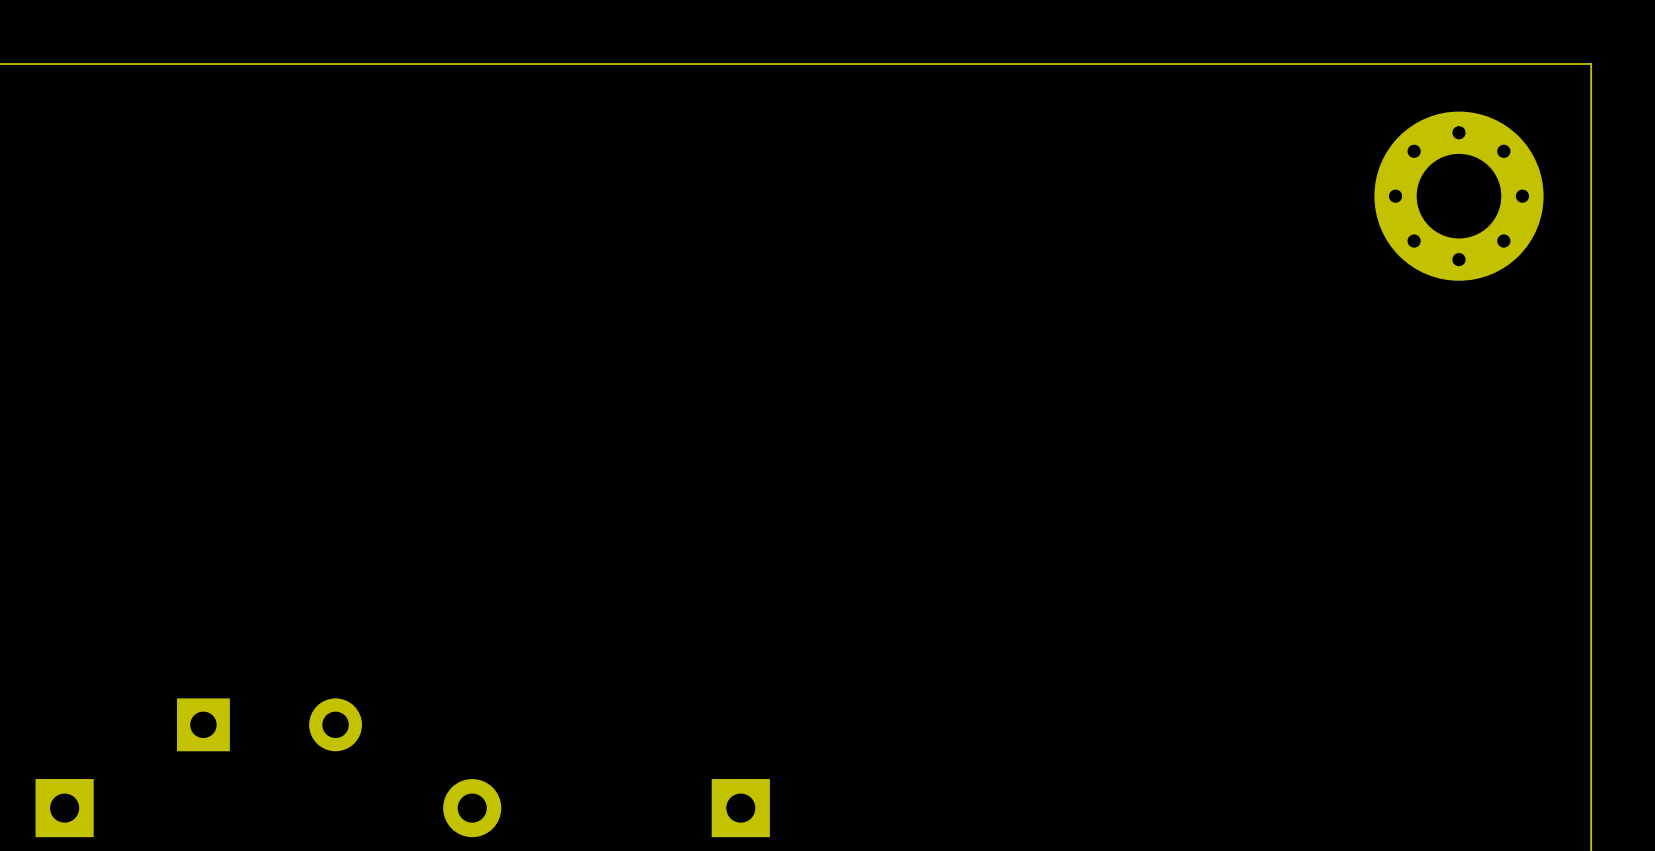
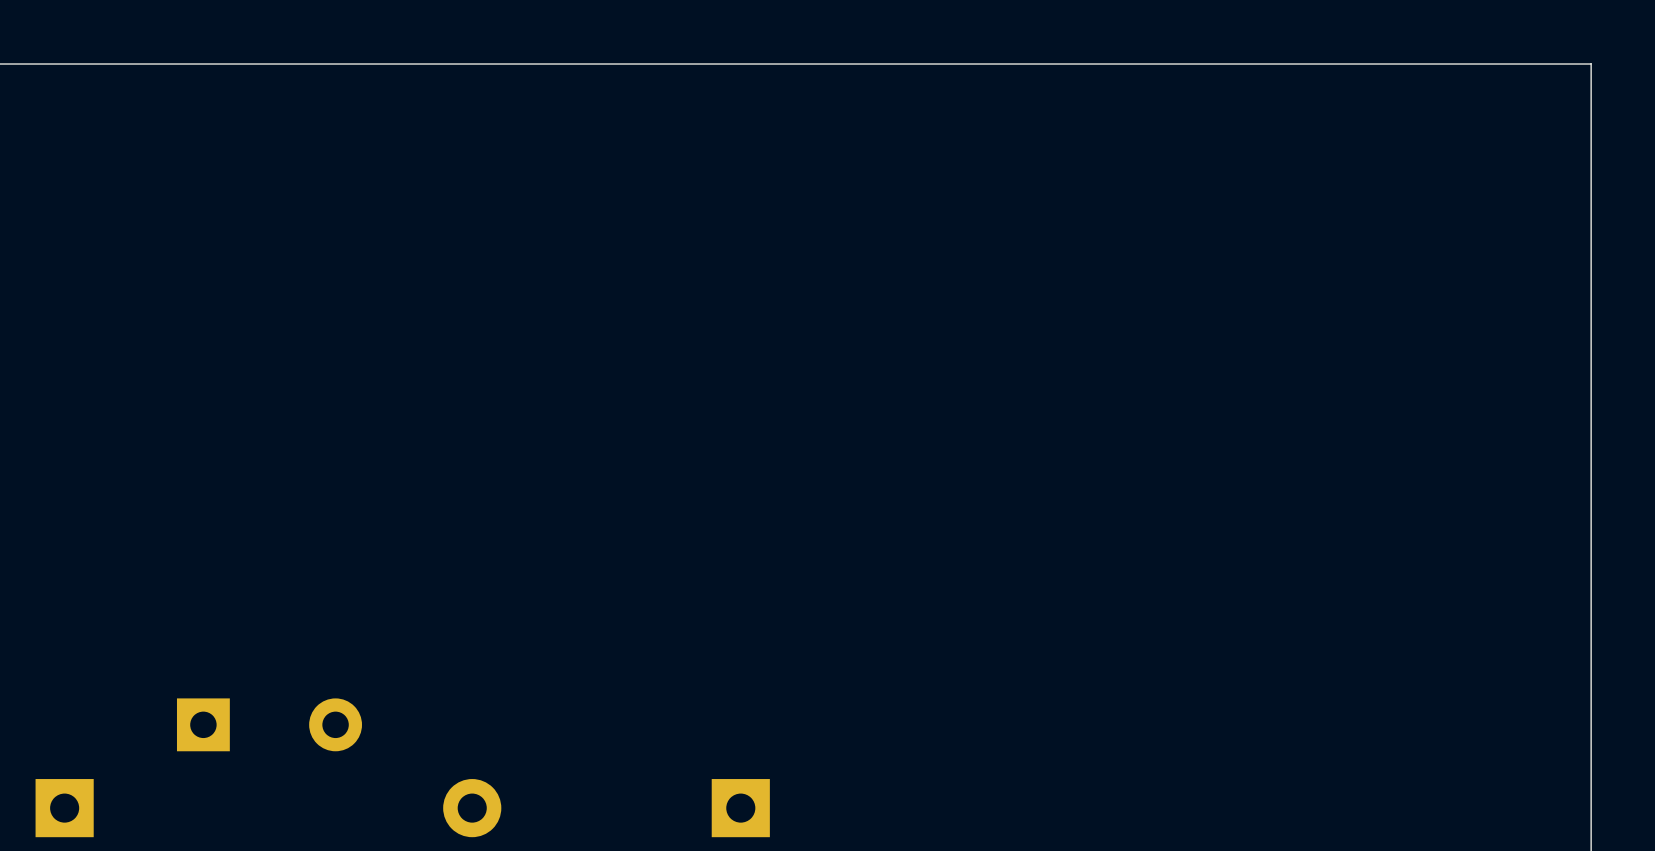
part: (1458, 196) -> none

